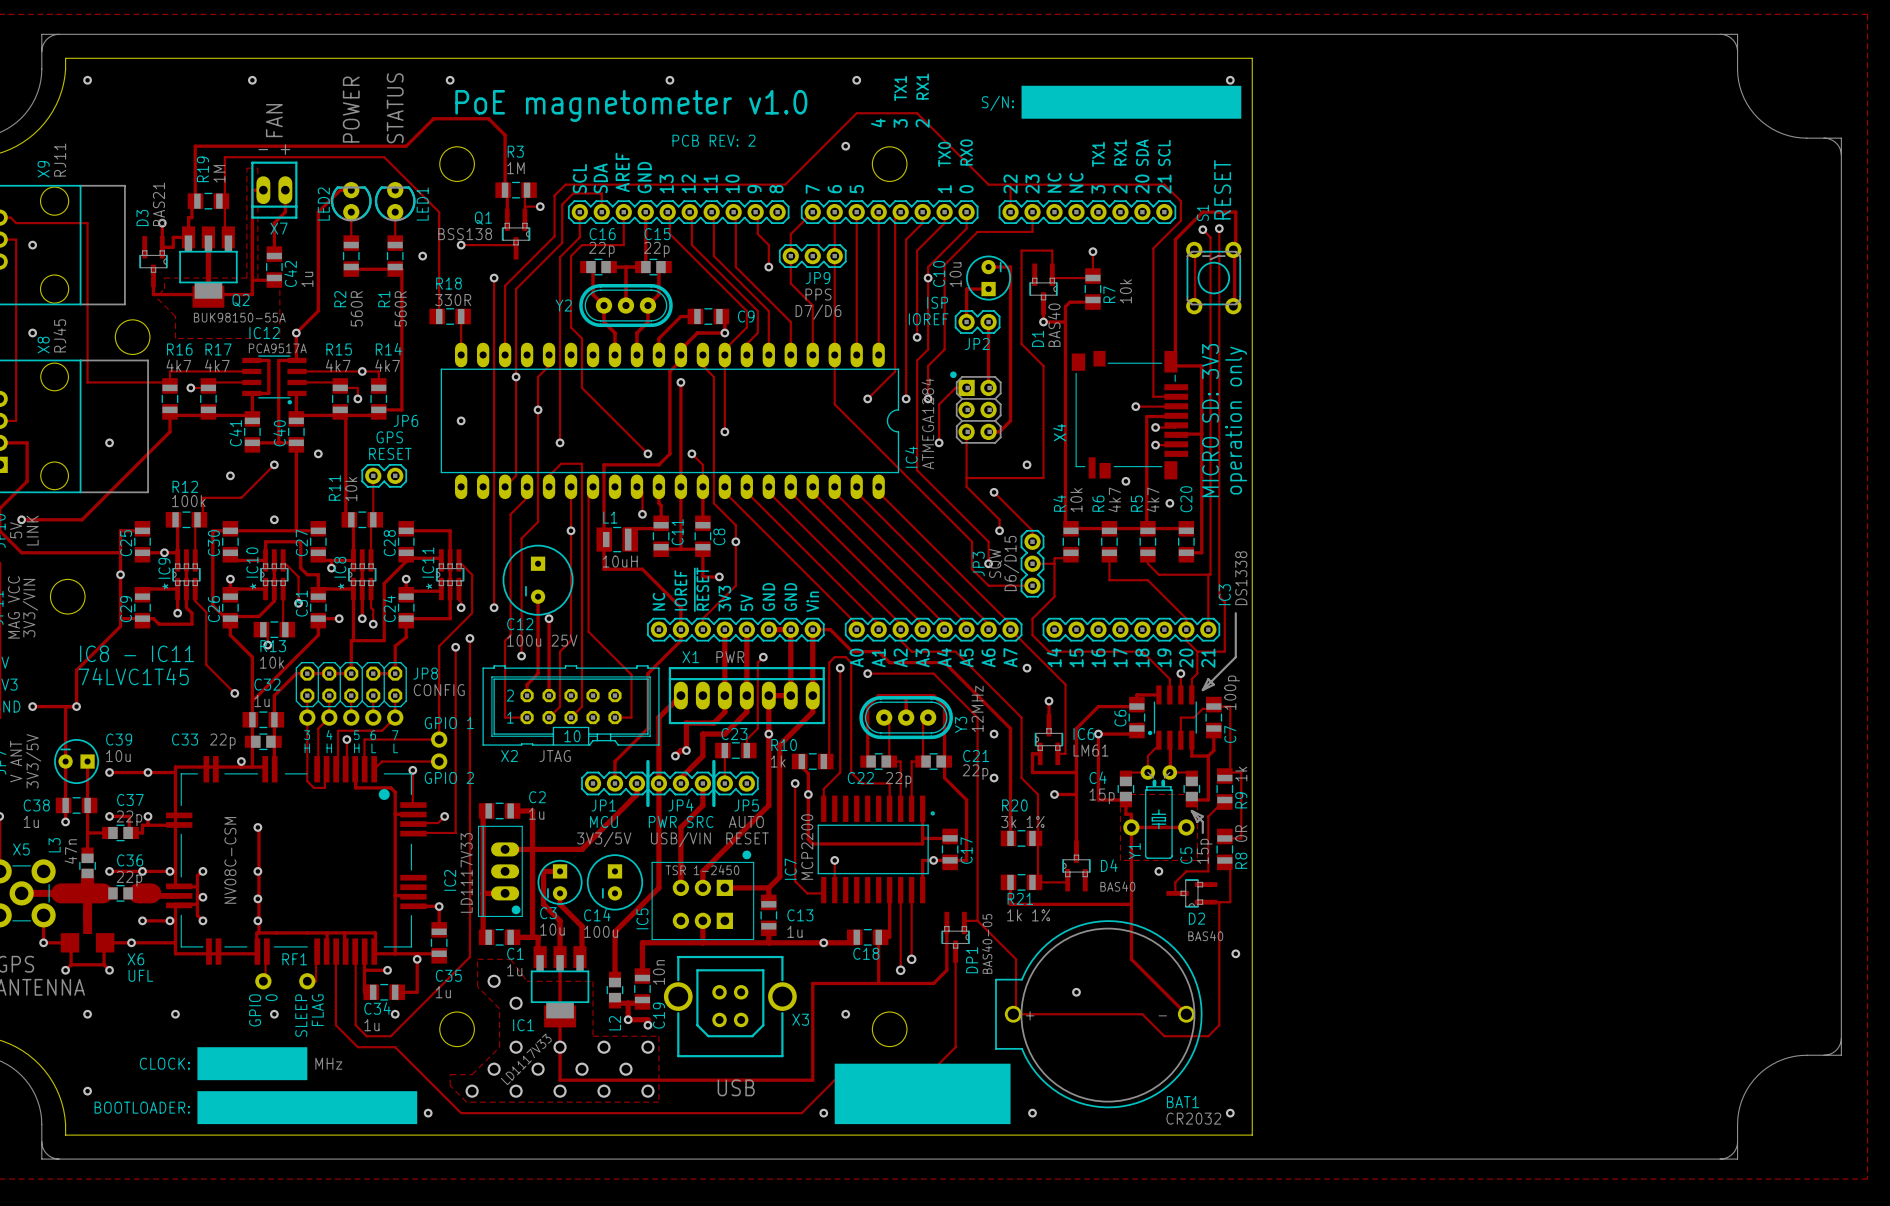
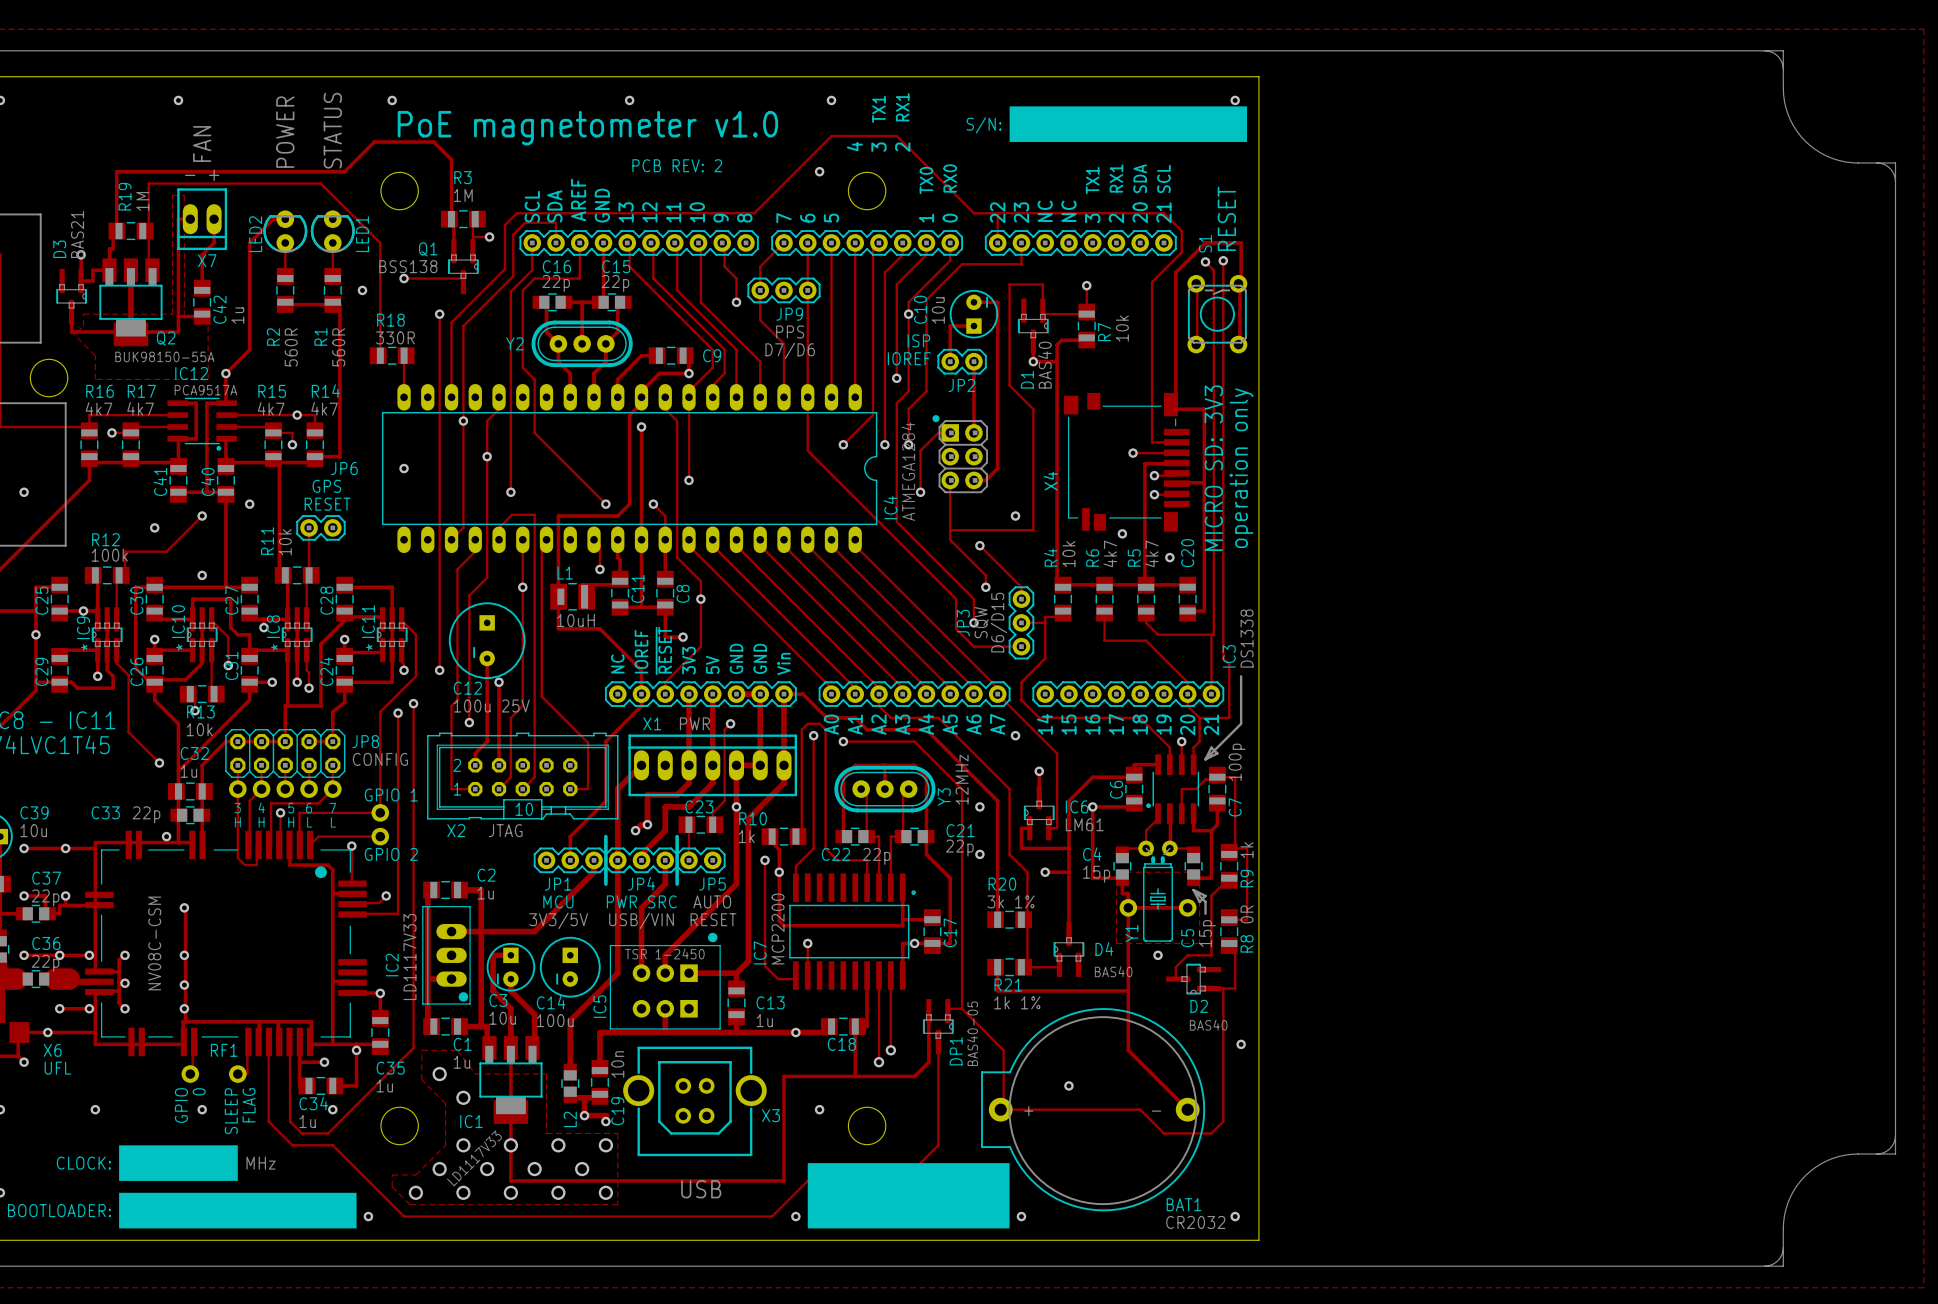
BAT1 footprint: [995, 920, 1203, 1109] -> [981, 1008, 1206, 1212]
drawing shape: [834, 1063, 1011, 1125] -> [807, 1163, 1010, 1229]

